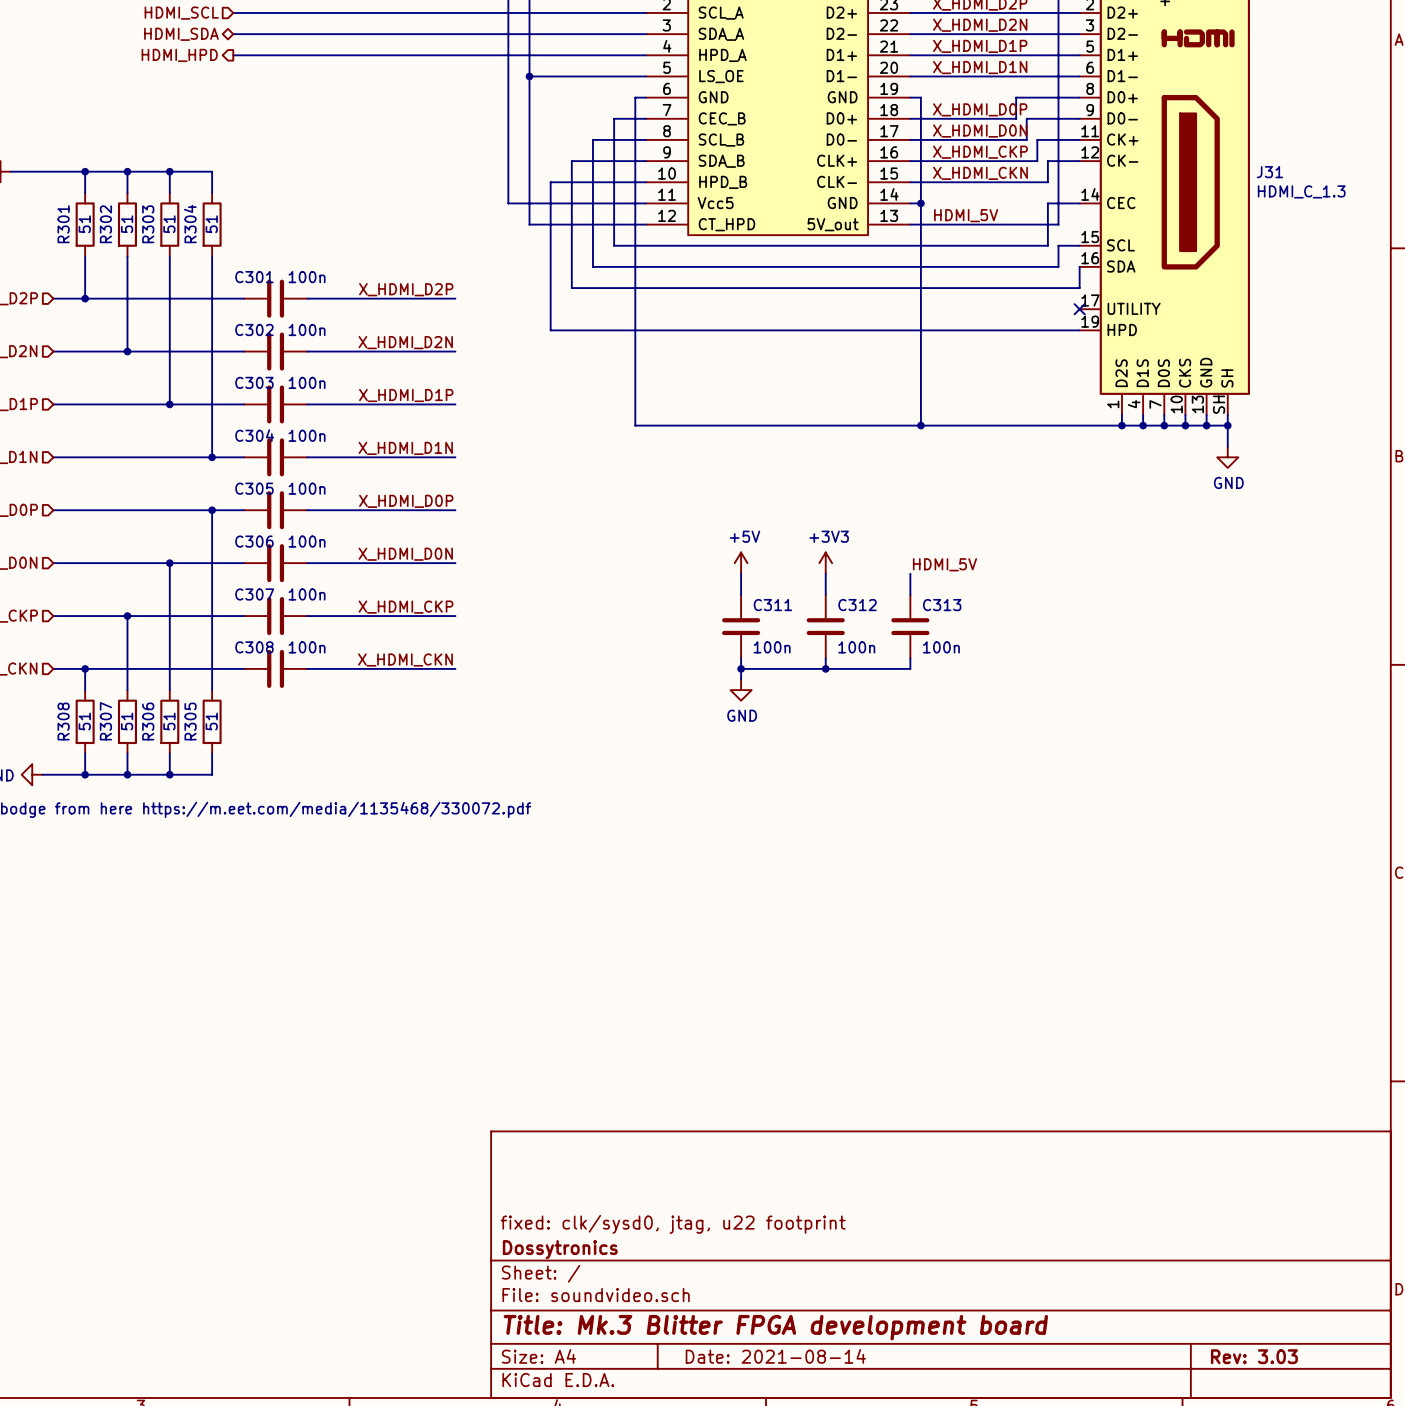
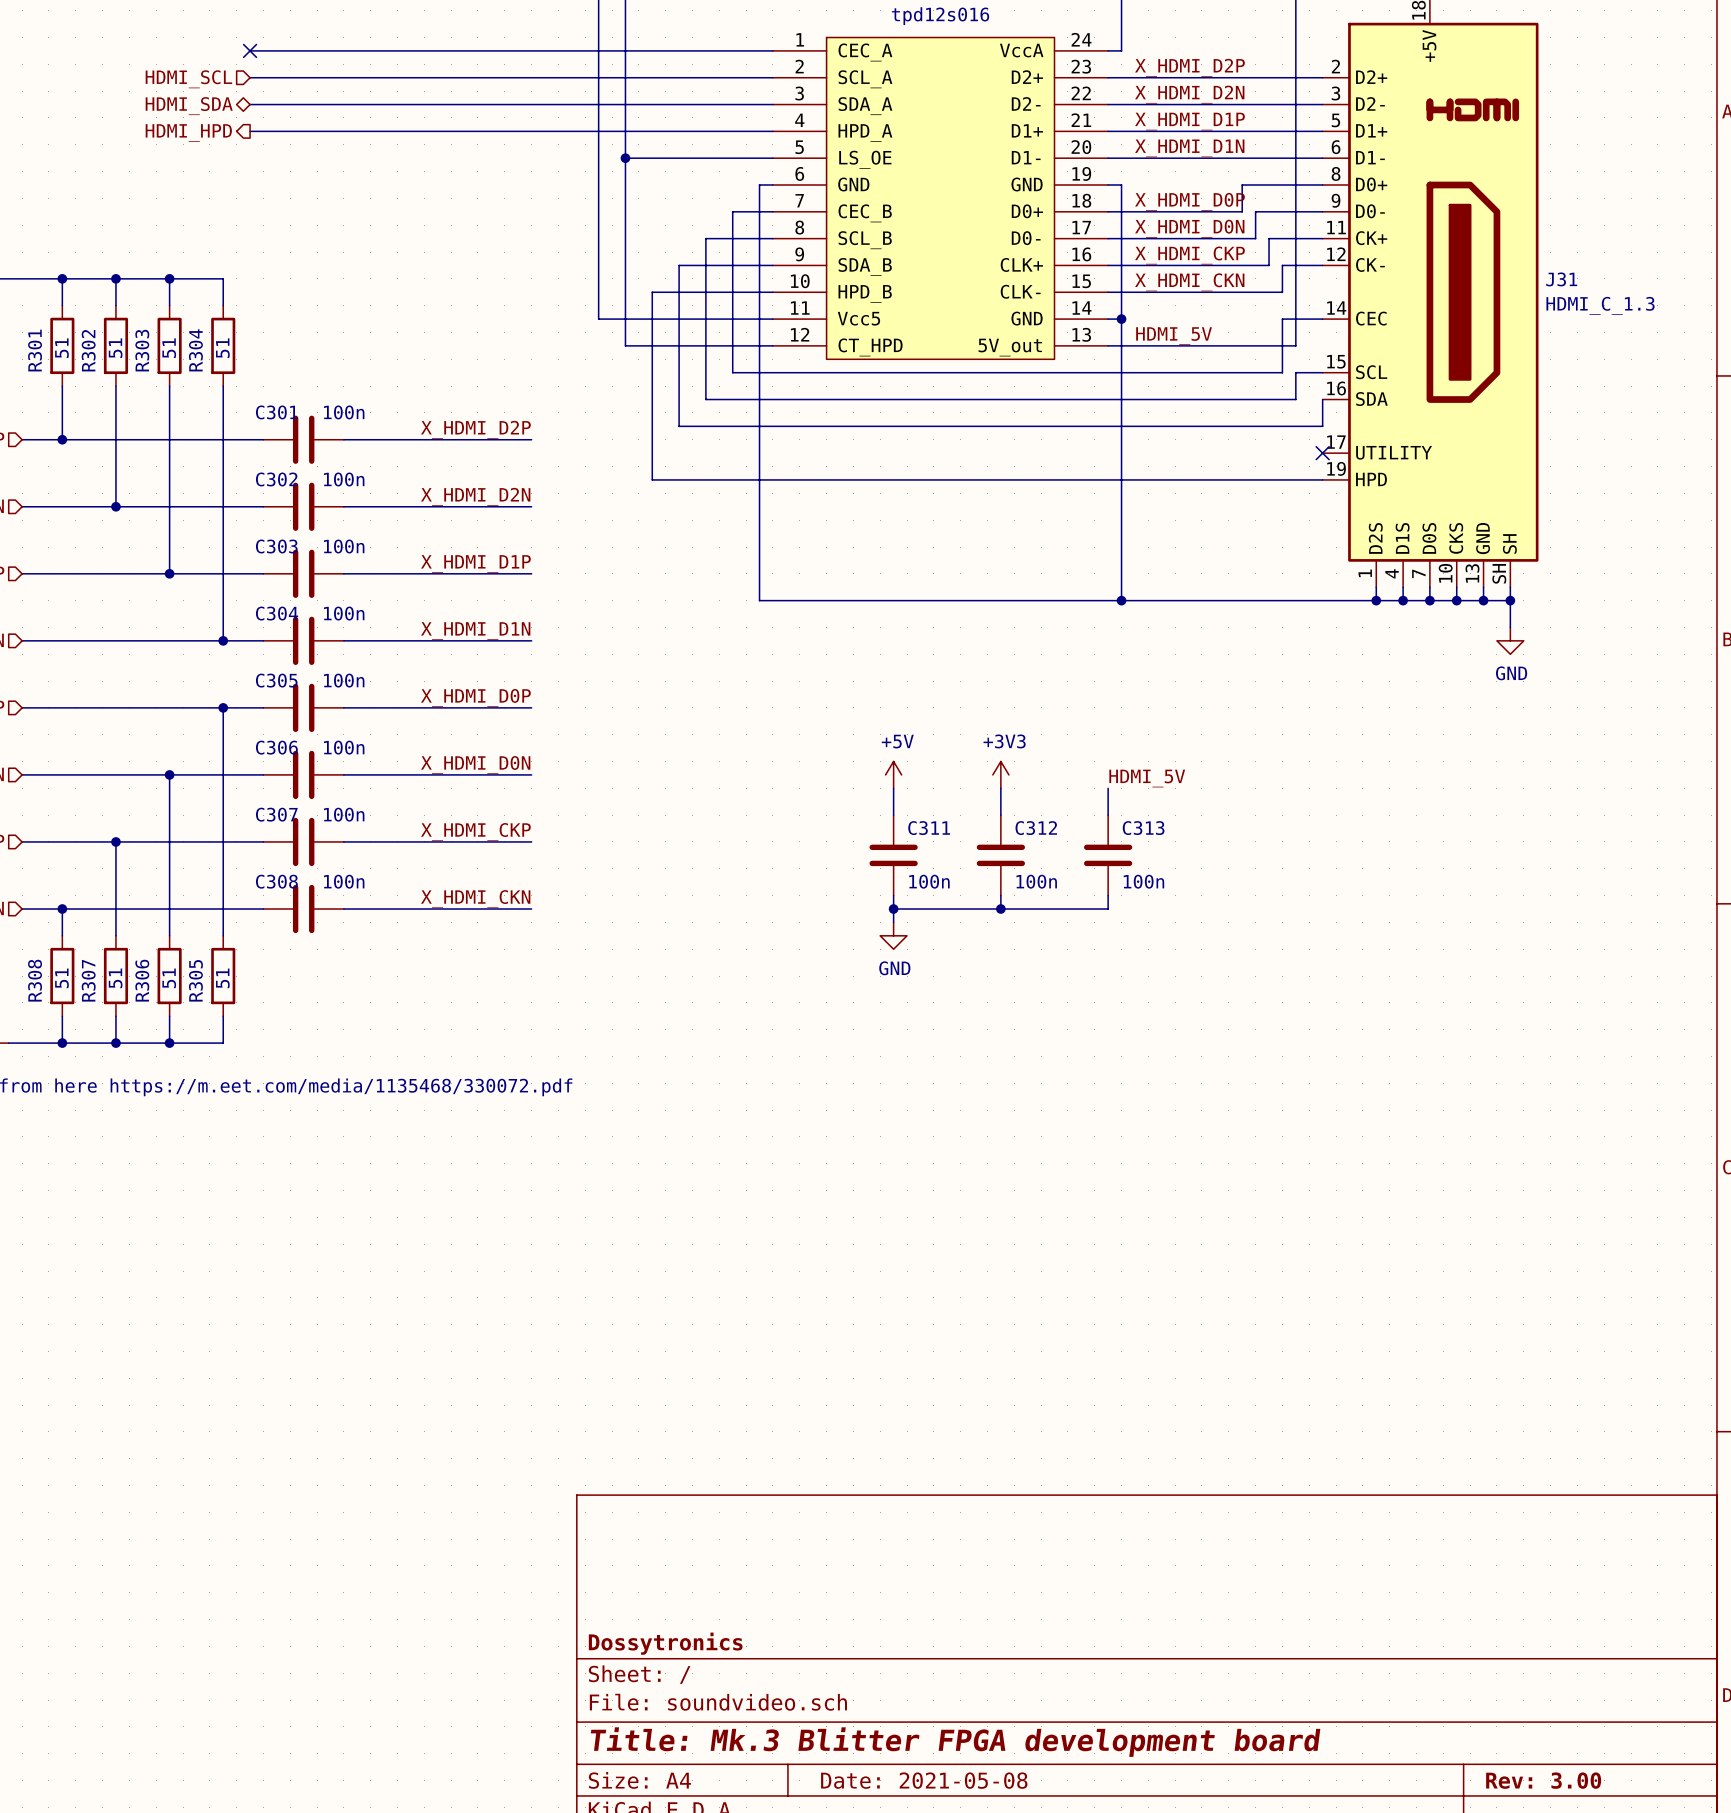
title block: fixed: clk/sysd0, jtag, u22 footprint (673, 1224) -> none
title block: Date: 2021-08-14 (775, 1356) -> Date: 2021-05-08 (924, 1780)
title block: Rev: 3.03 (1254, 1356) -> Rev: 3.00 (1543, 1780)

